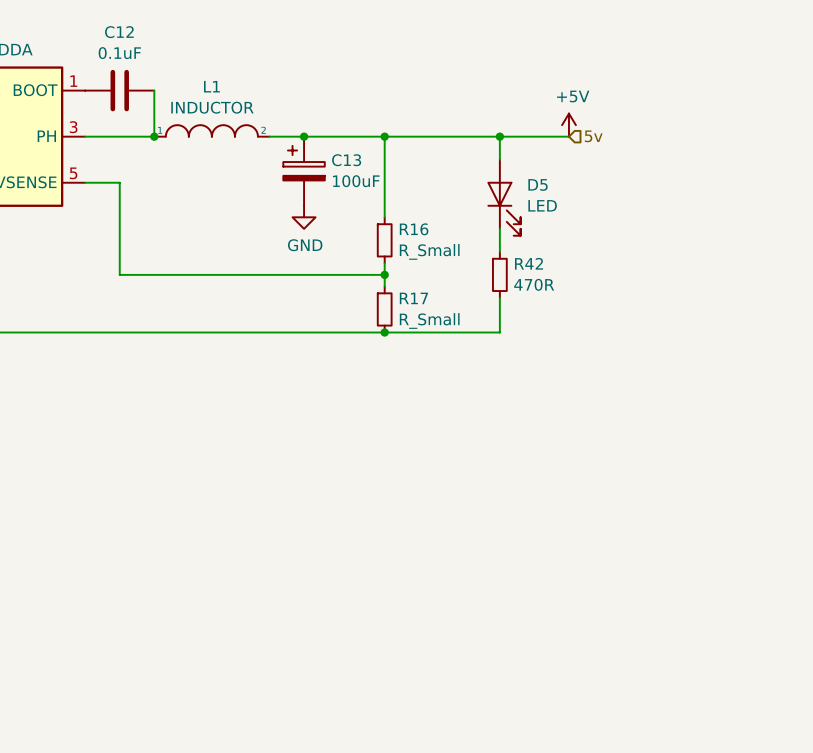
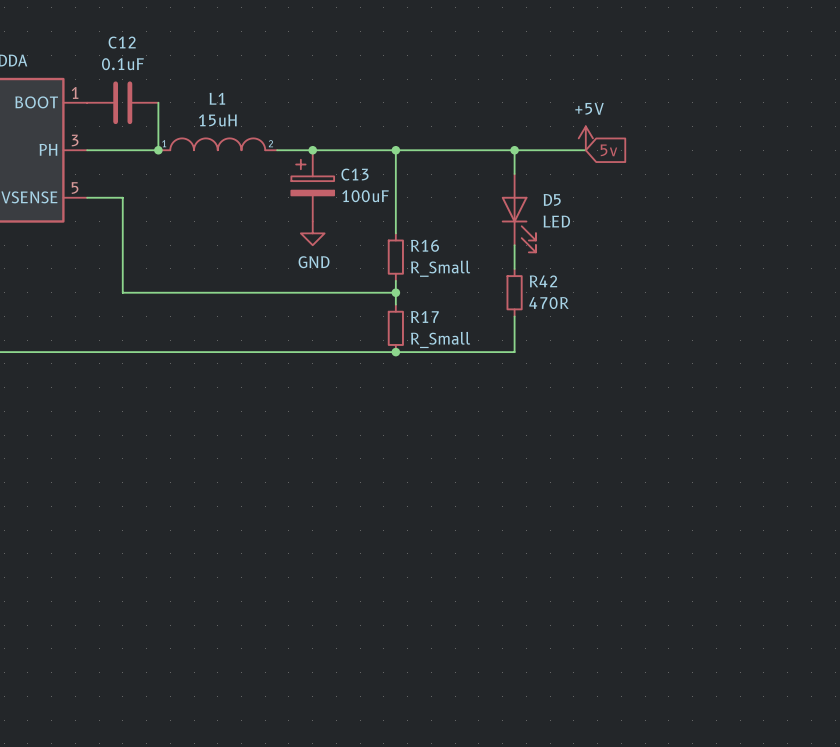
L1 value: INDUCTOR (212, 107) -> 15uH (217, 120)
global label: none -> 5v (608, 150)
hierarchical label: 5v (593, 136) -> none

